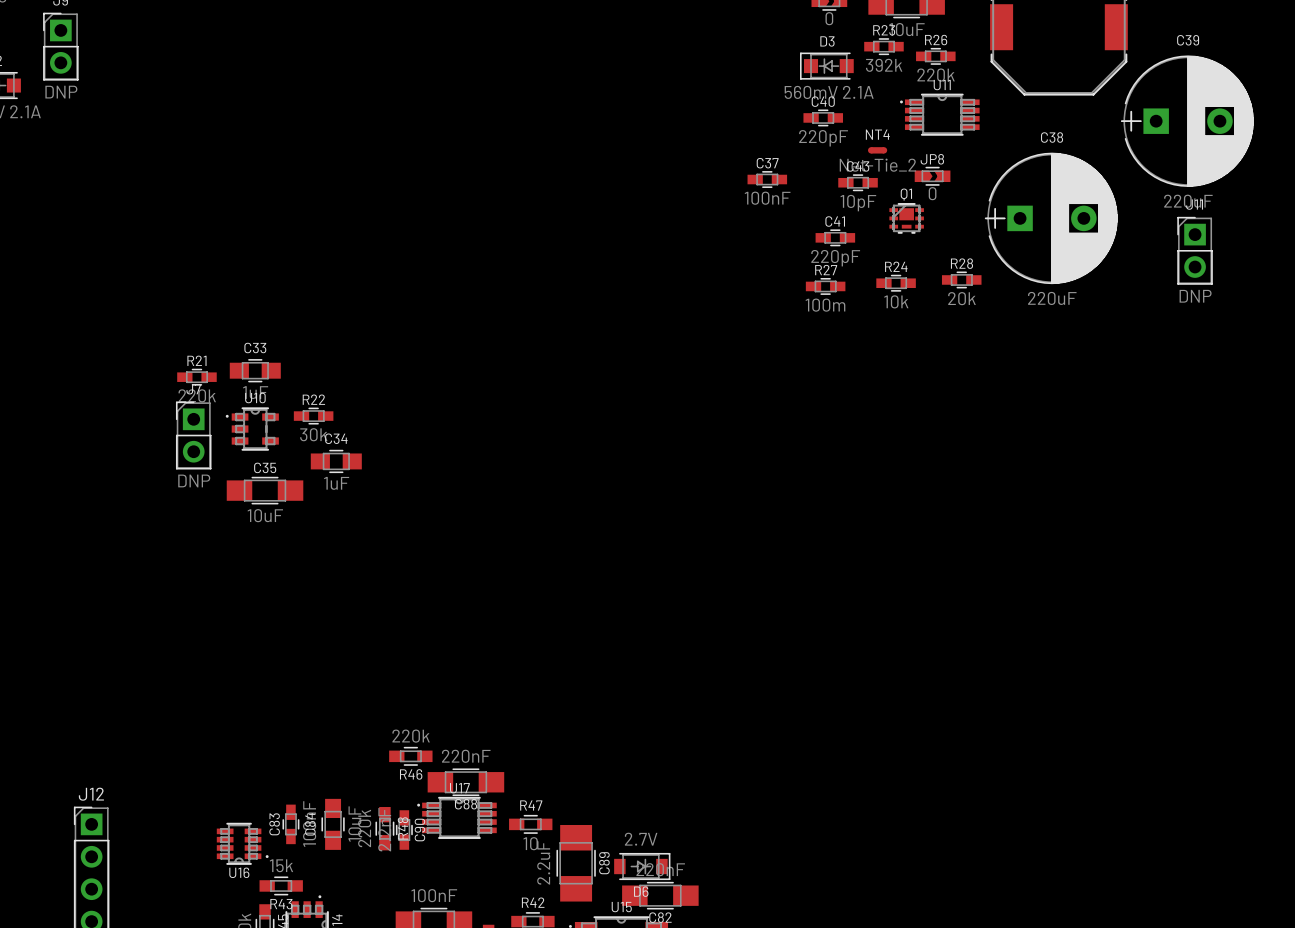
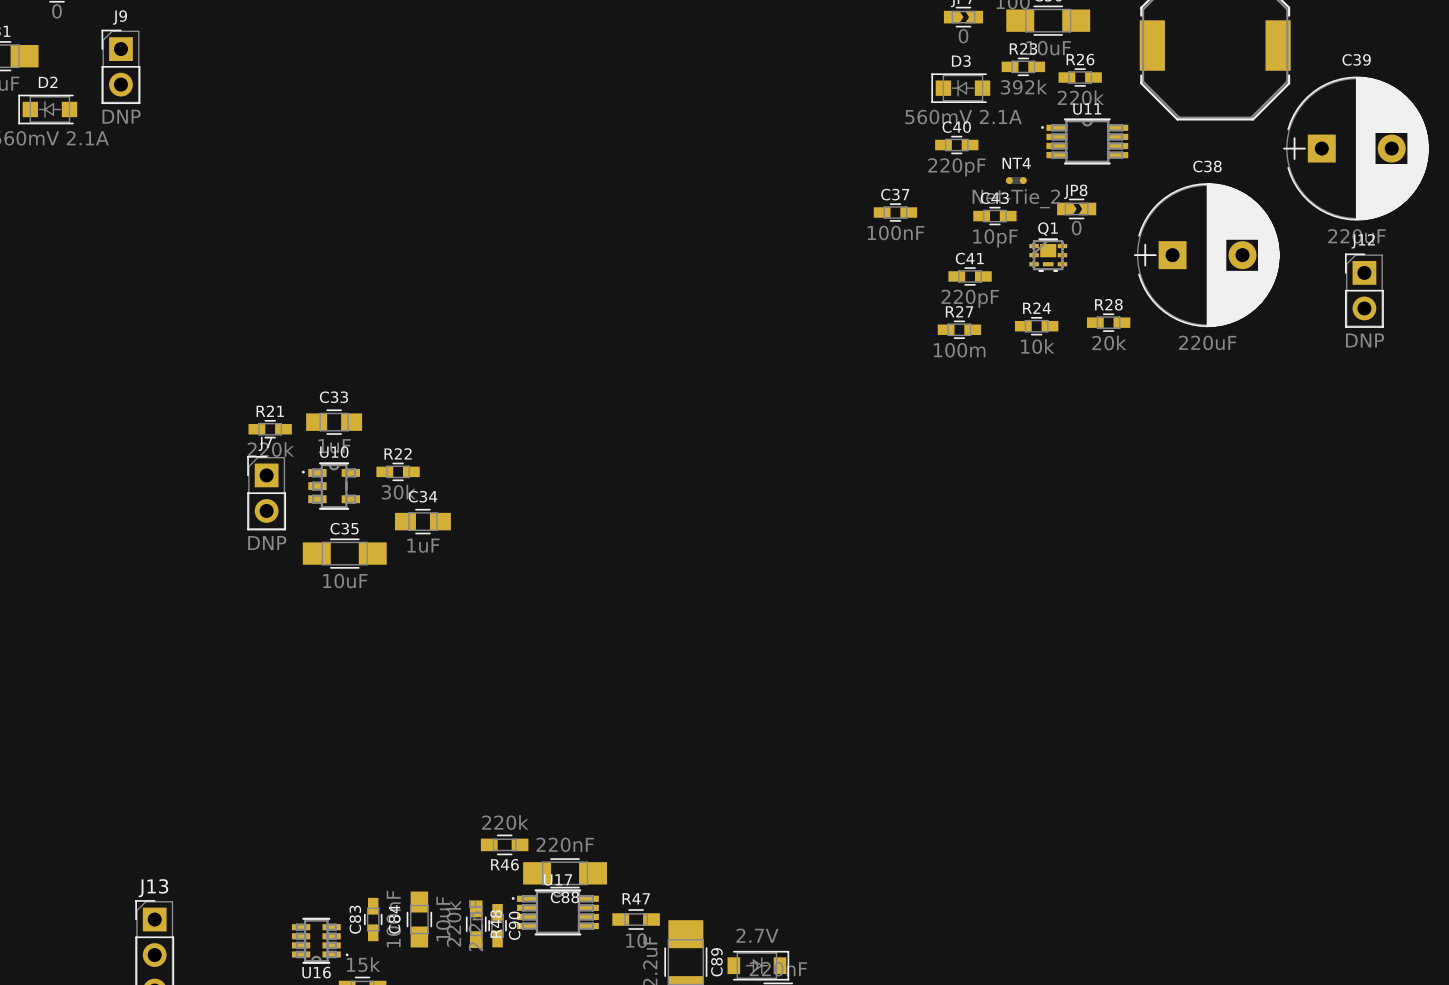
J11 name: J11 (1194, 204) -> J12 (1363, 241)
J12 name: J12 (91, 794) -> J13 (153, 888)

